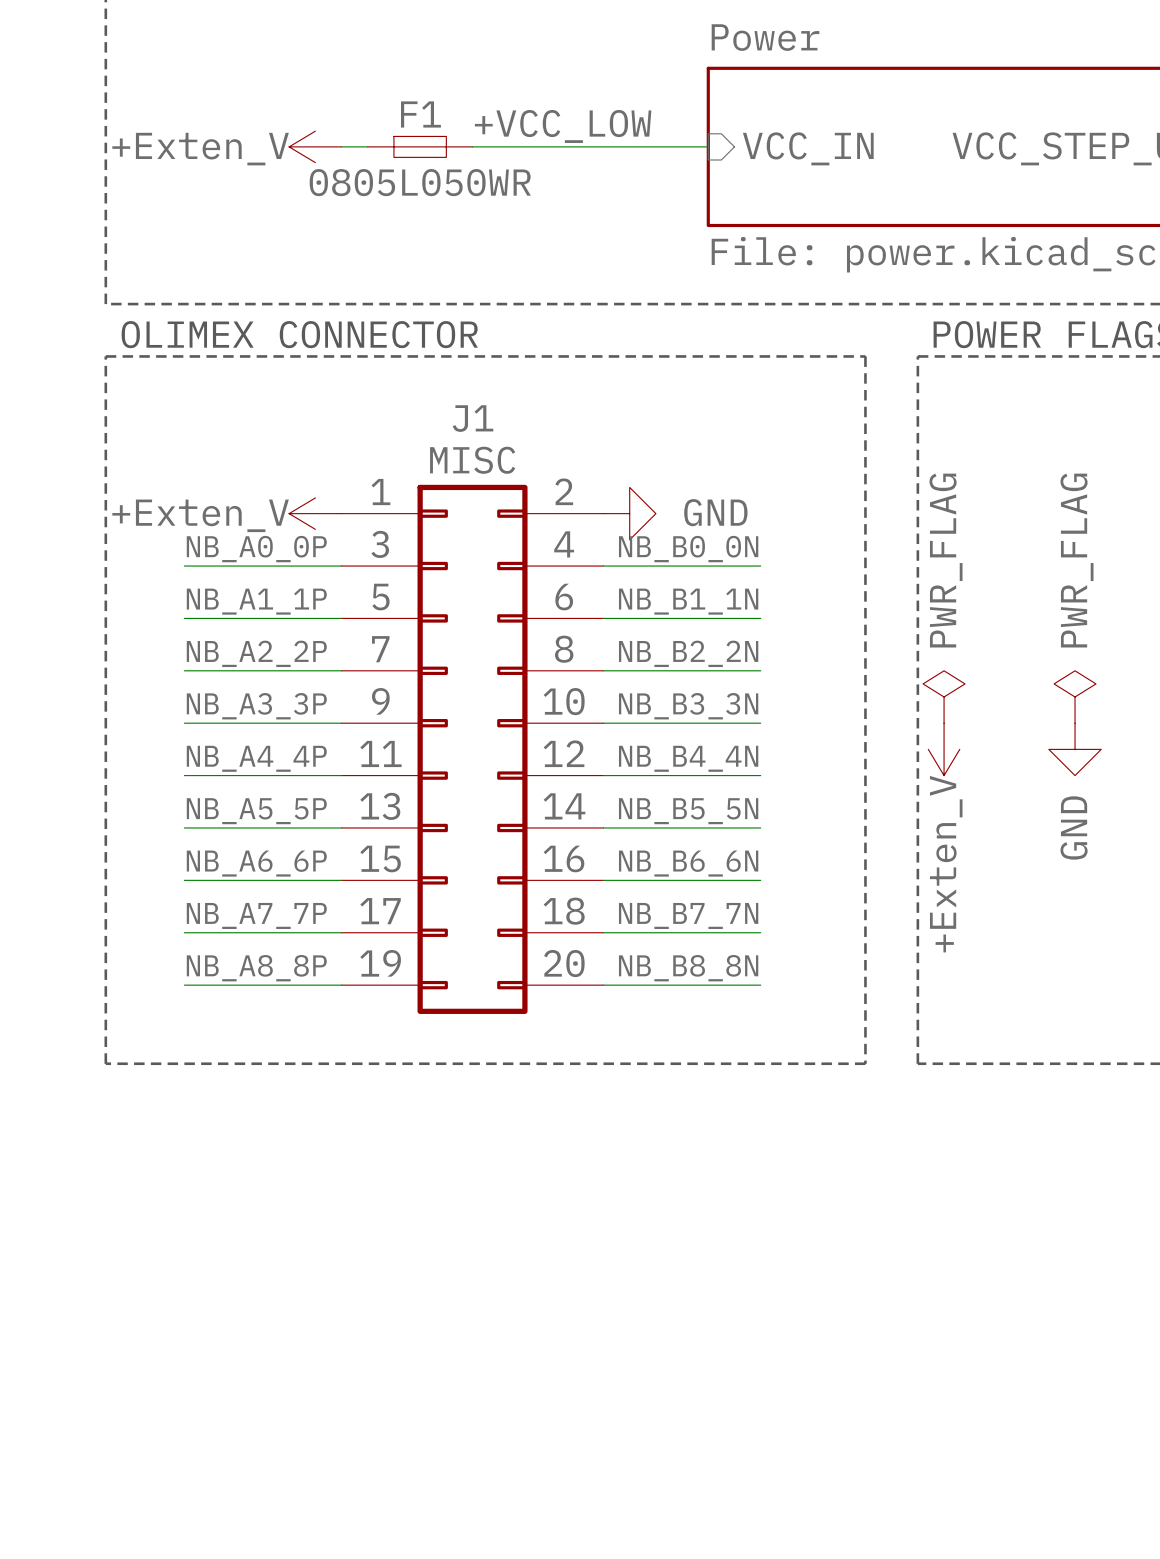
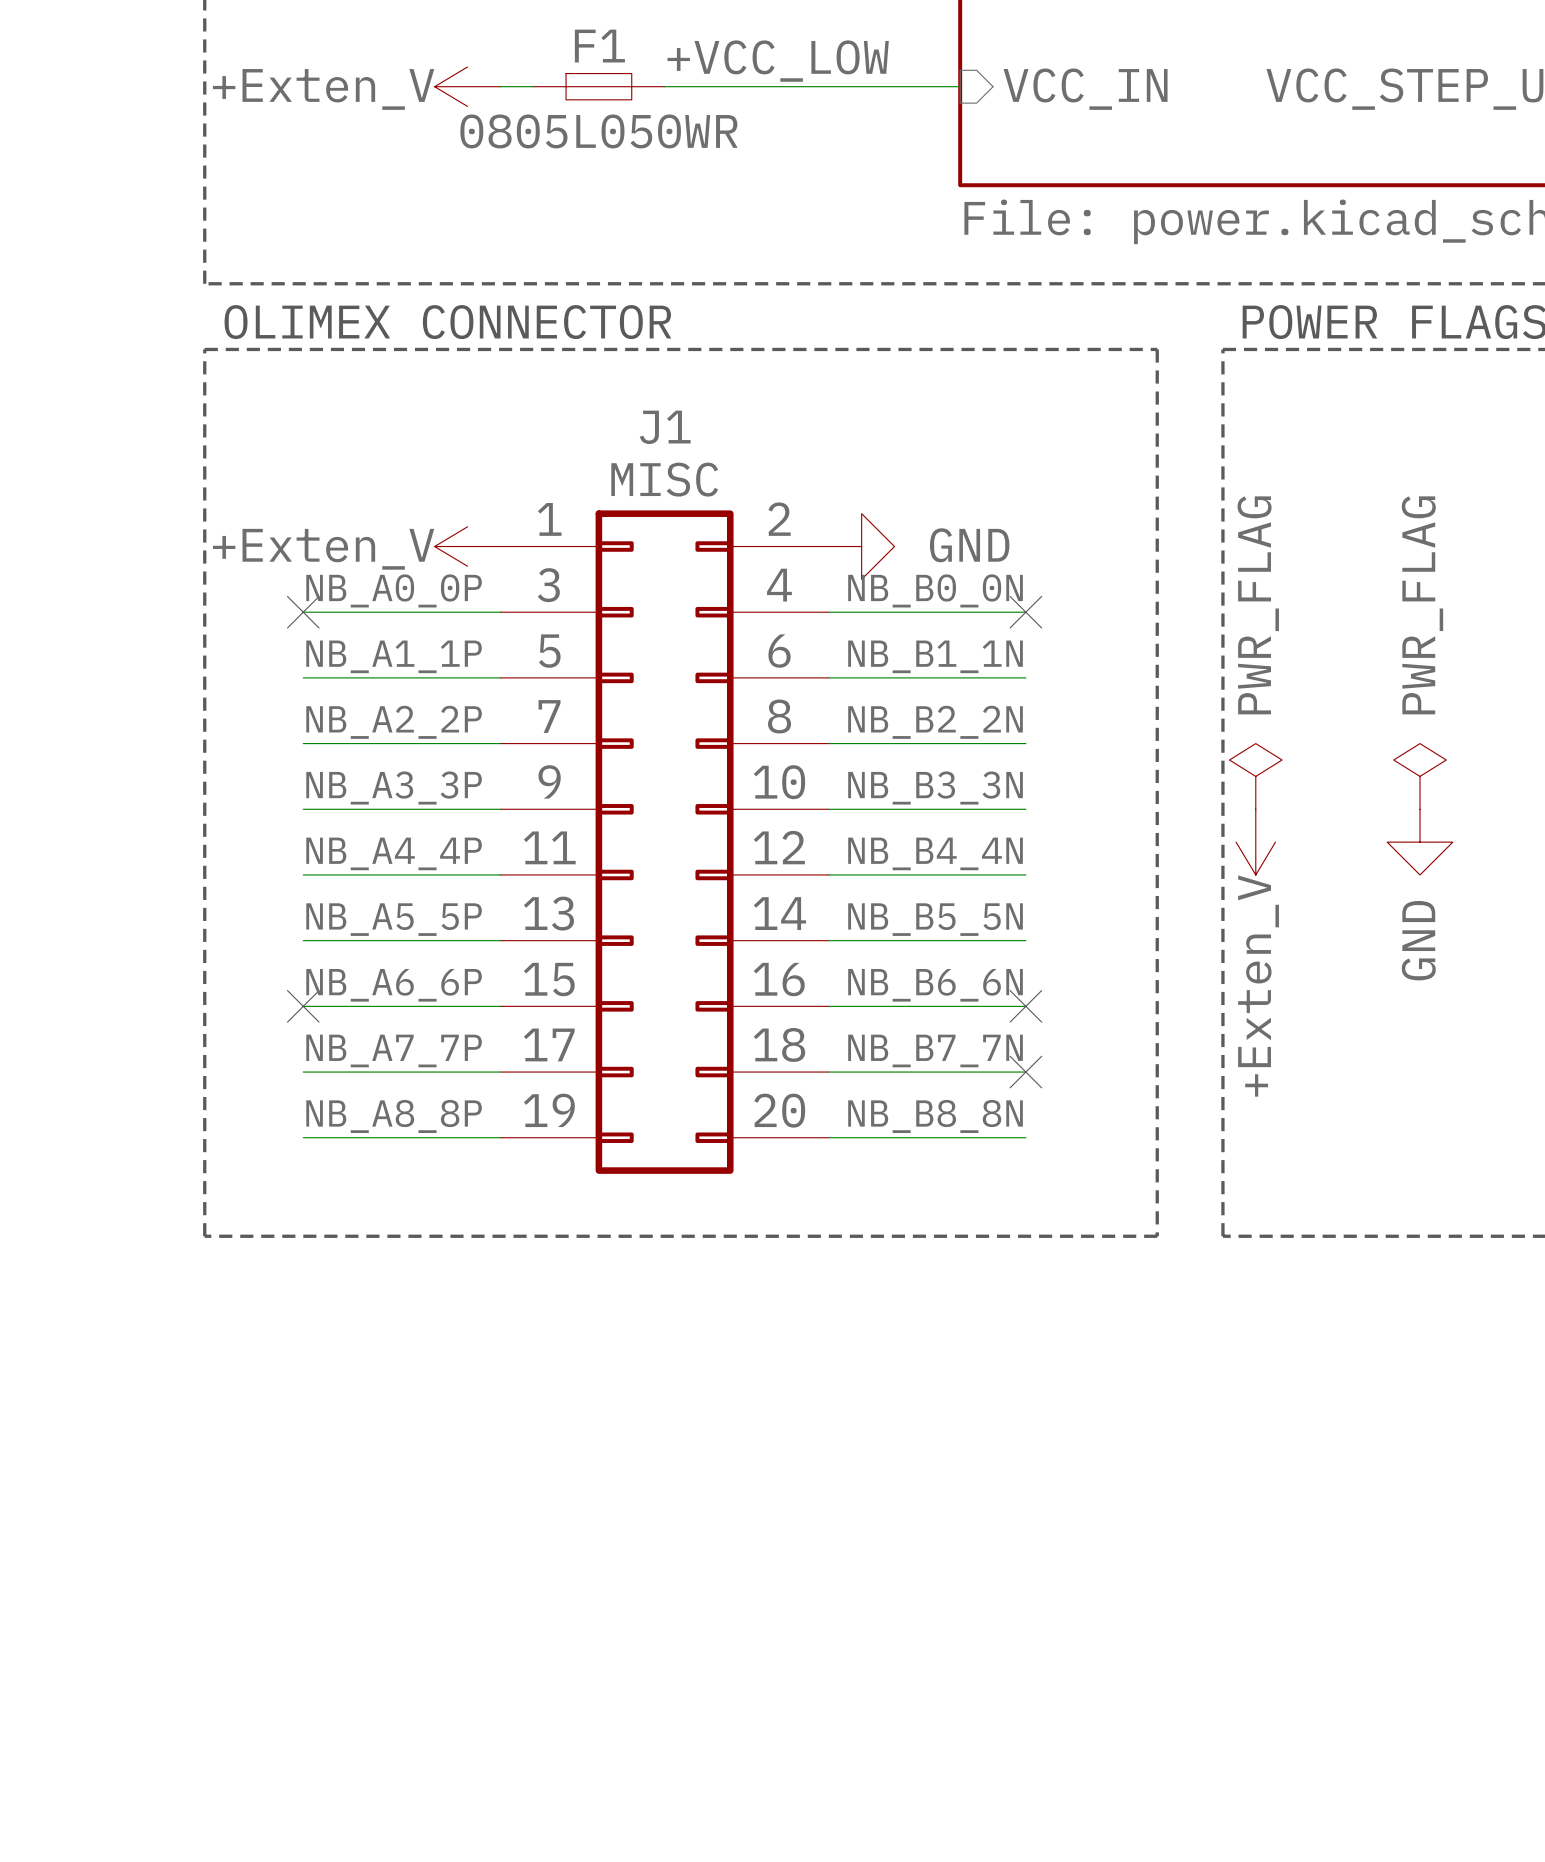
no-connect mark: none -> (303, 612)
no-connect mark: none -> (1025, 612)
no-connect mark: none -> (303, 1006)
no-connect mark: none -> (1025, 1006)
no-connect mark: none -> (1025, 1072)

